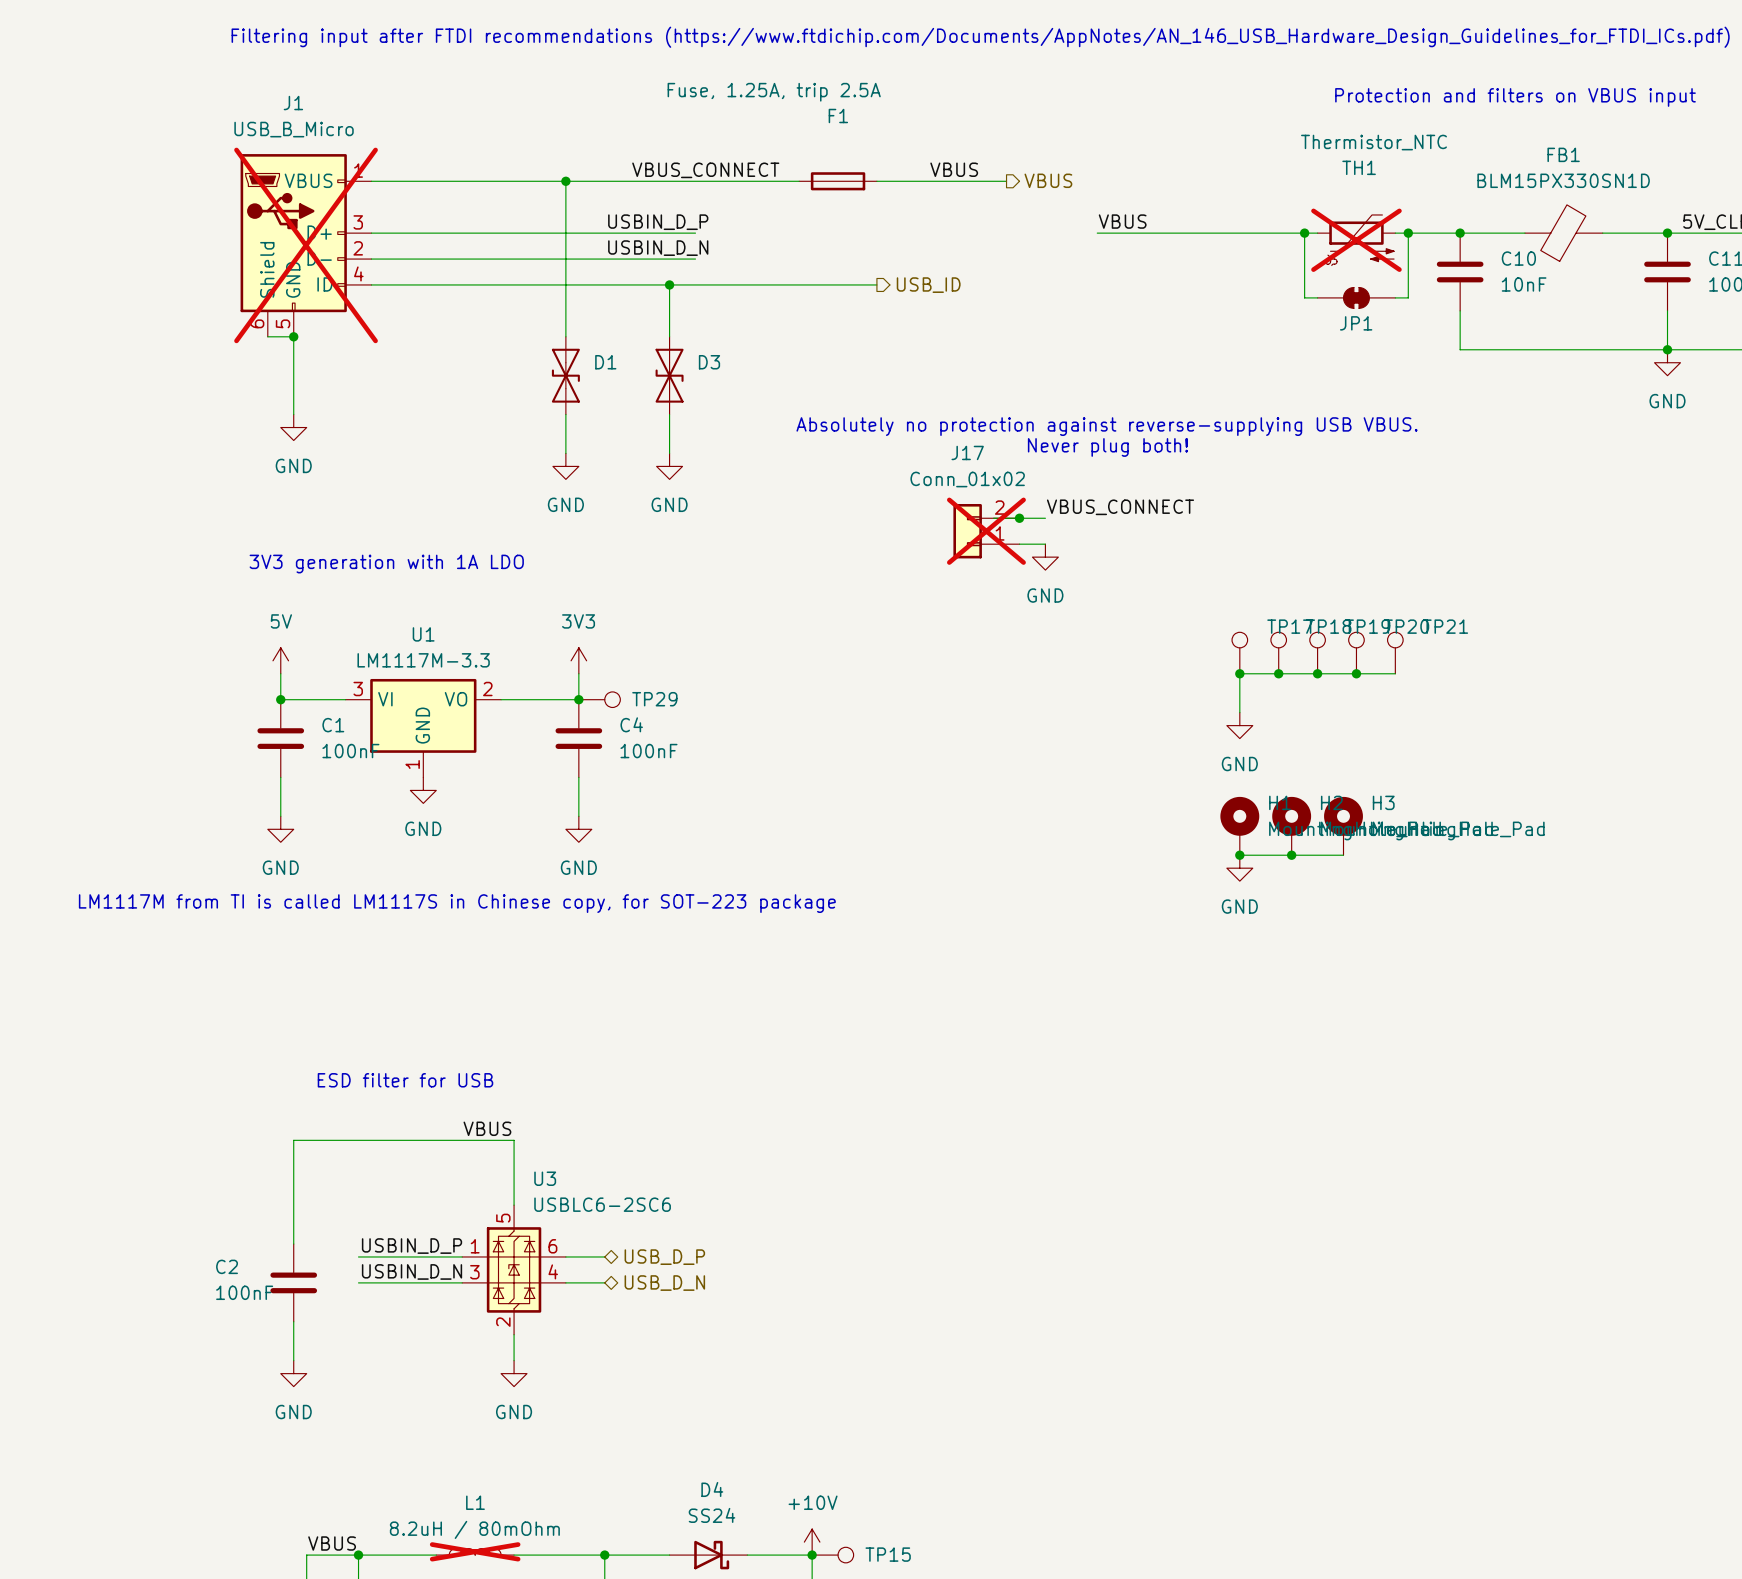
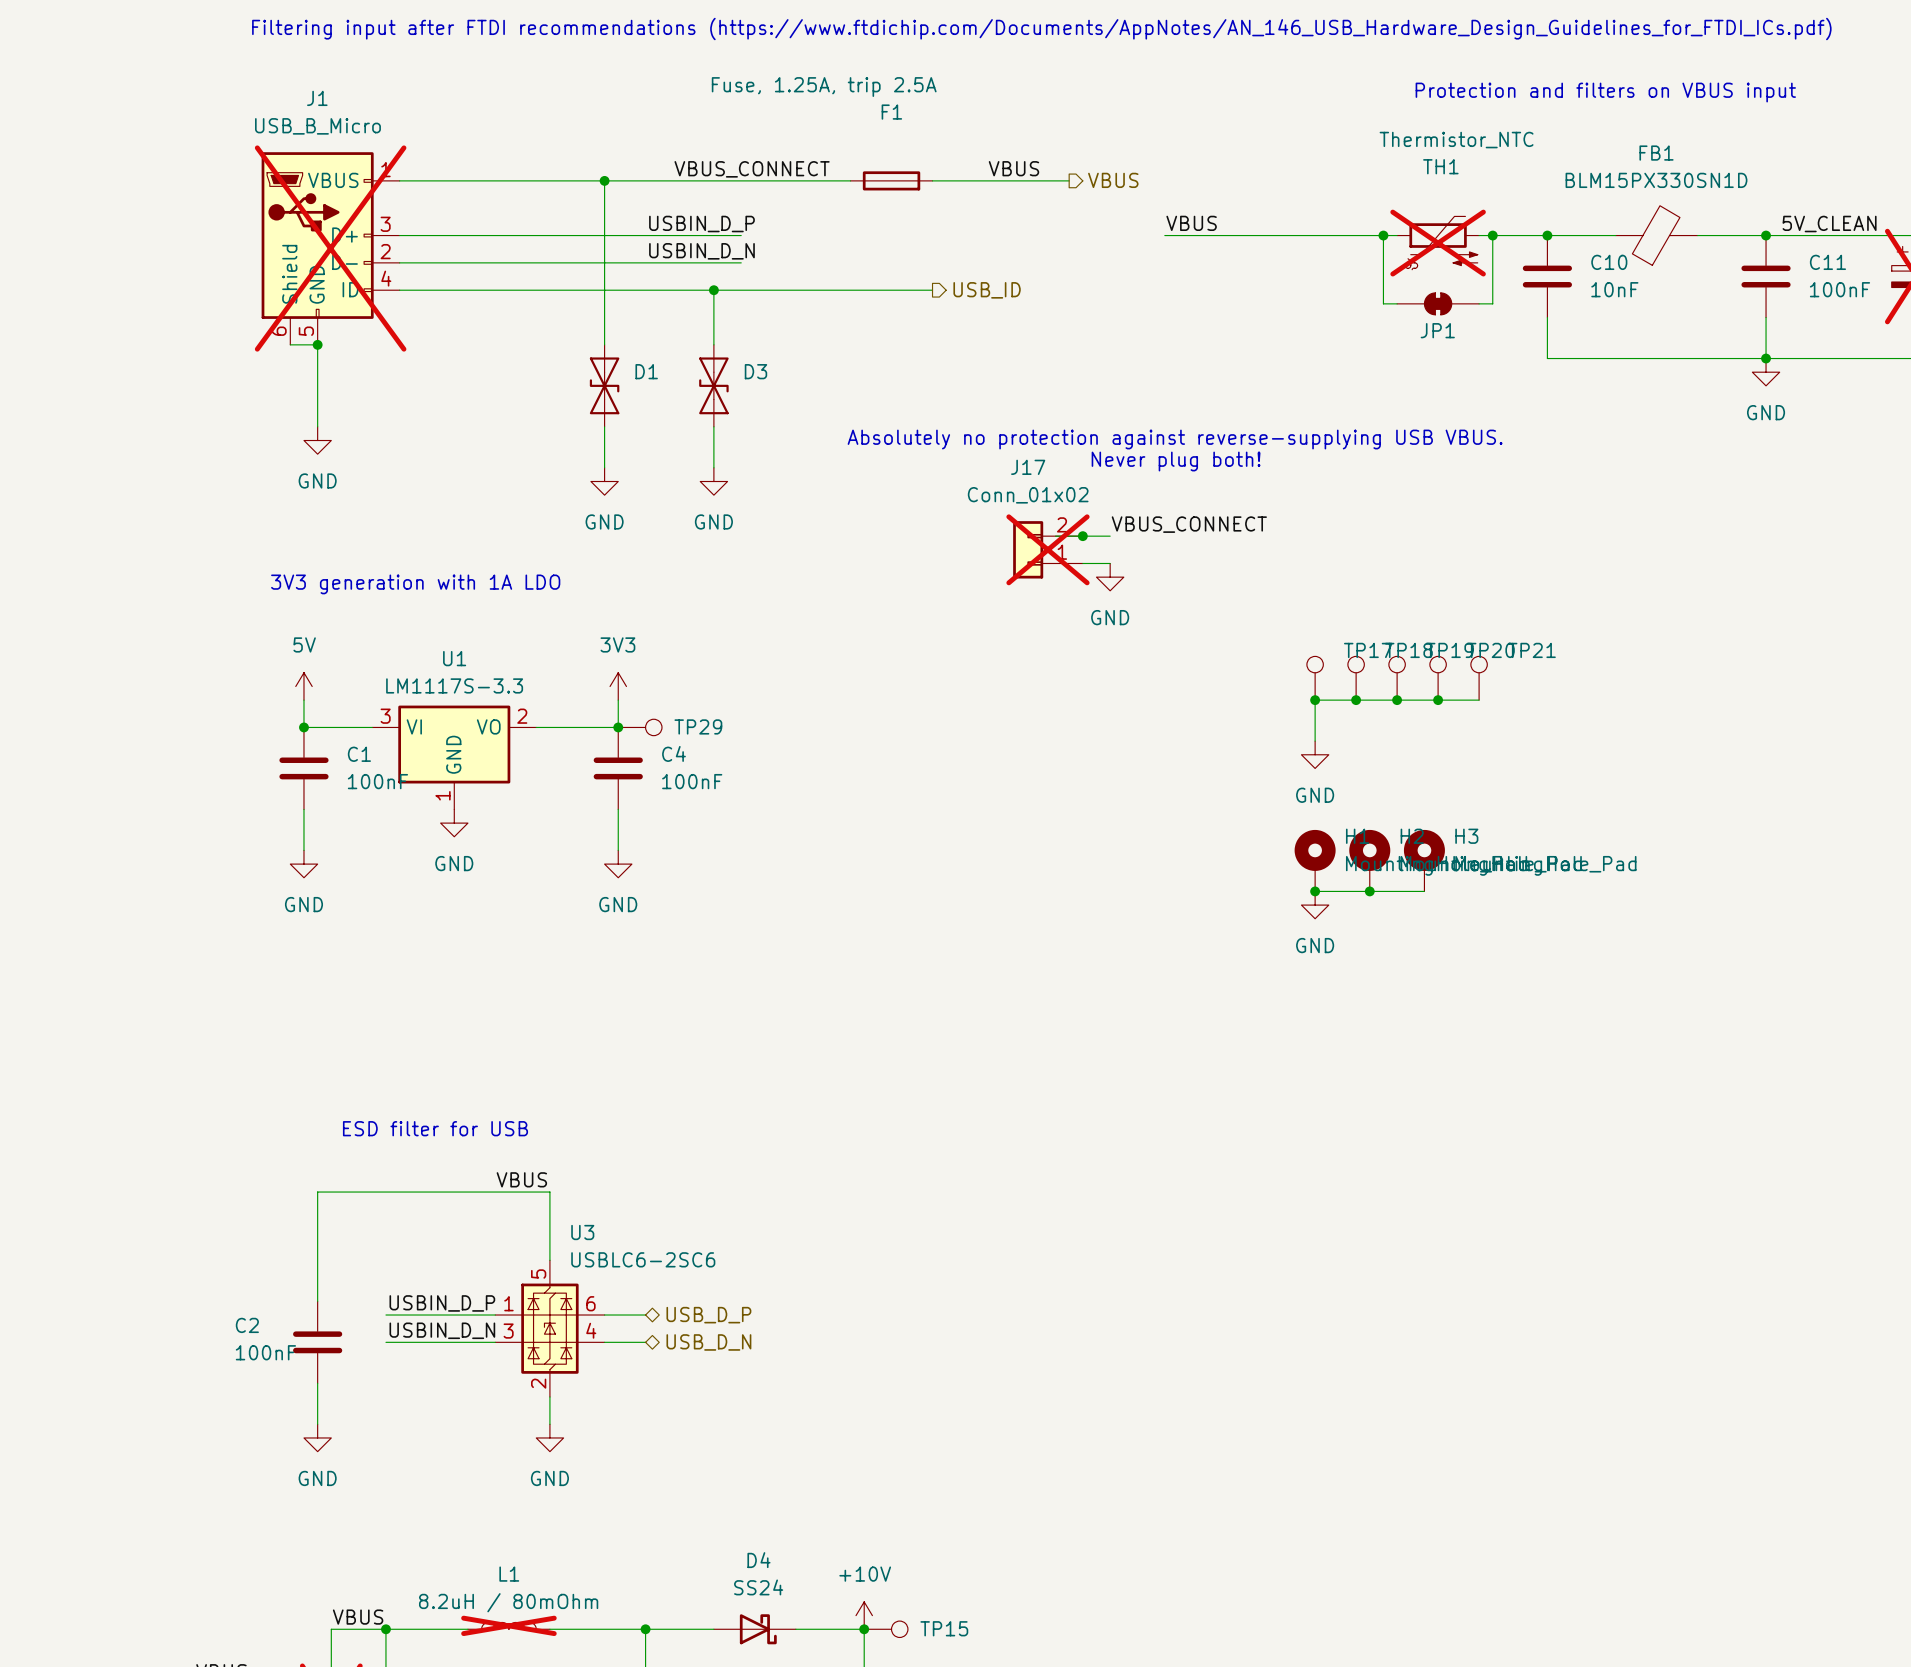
U1 value: LM1117M-3.3 (423, 660) -> LM1117S-3.3 (454, 685)
text: LM1117M from TI is called LM1117S in Chinese copy, for SOT-223 package (457, 903) -> none

